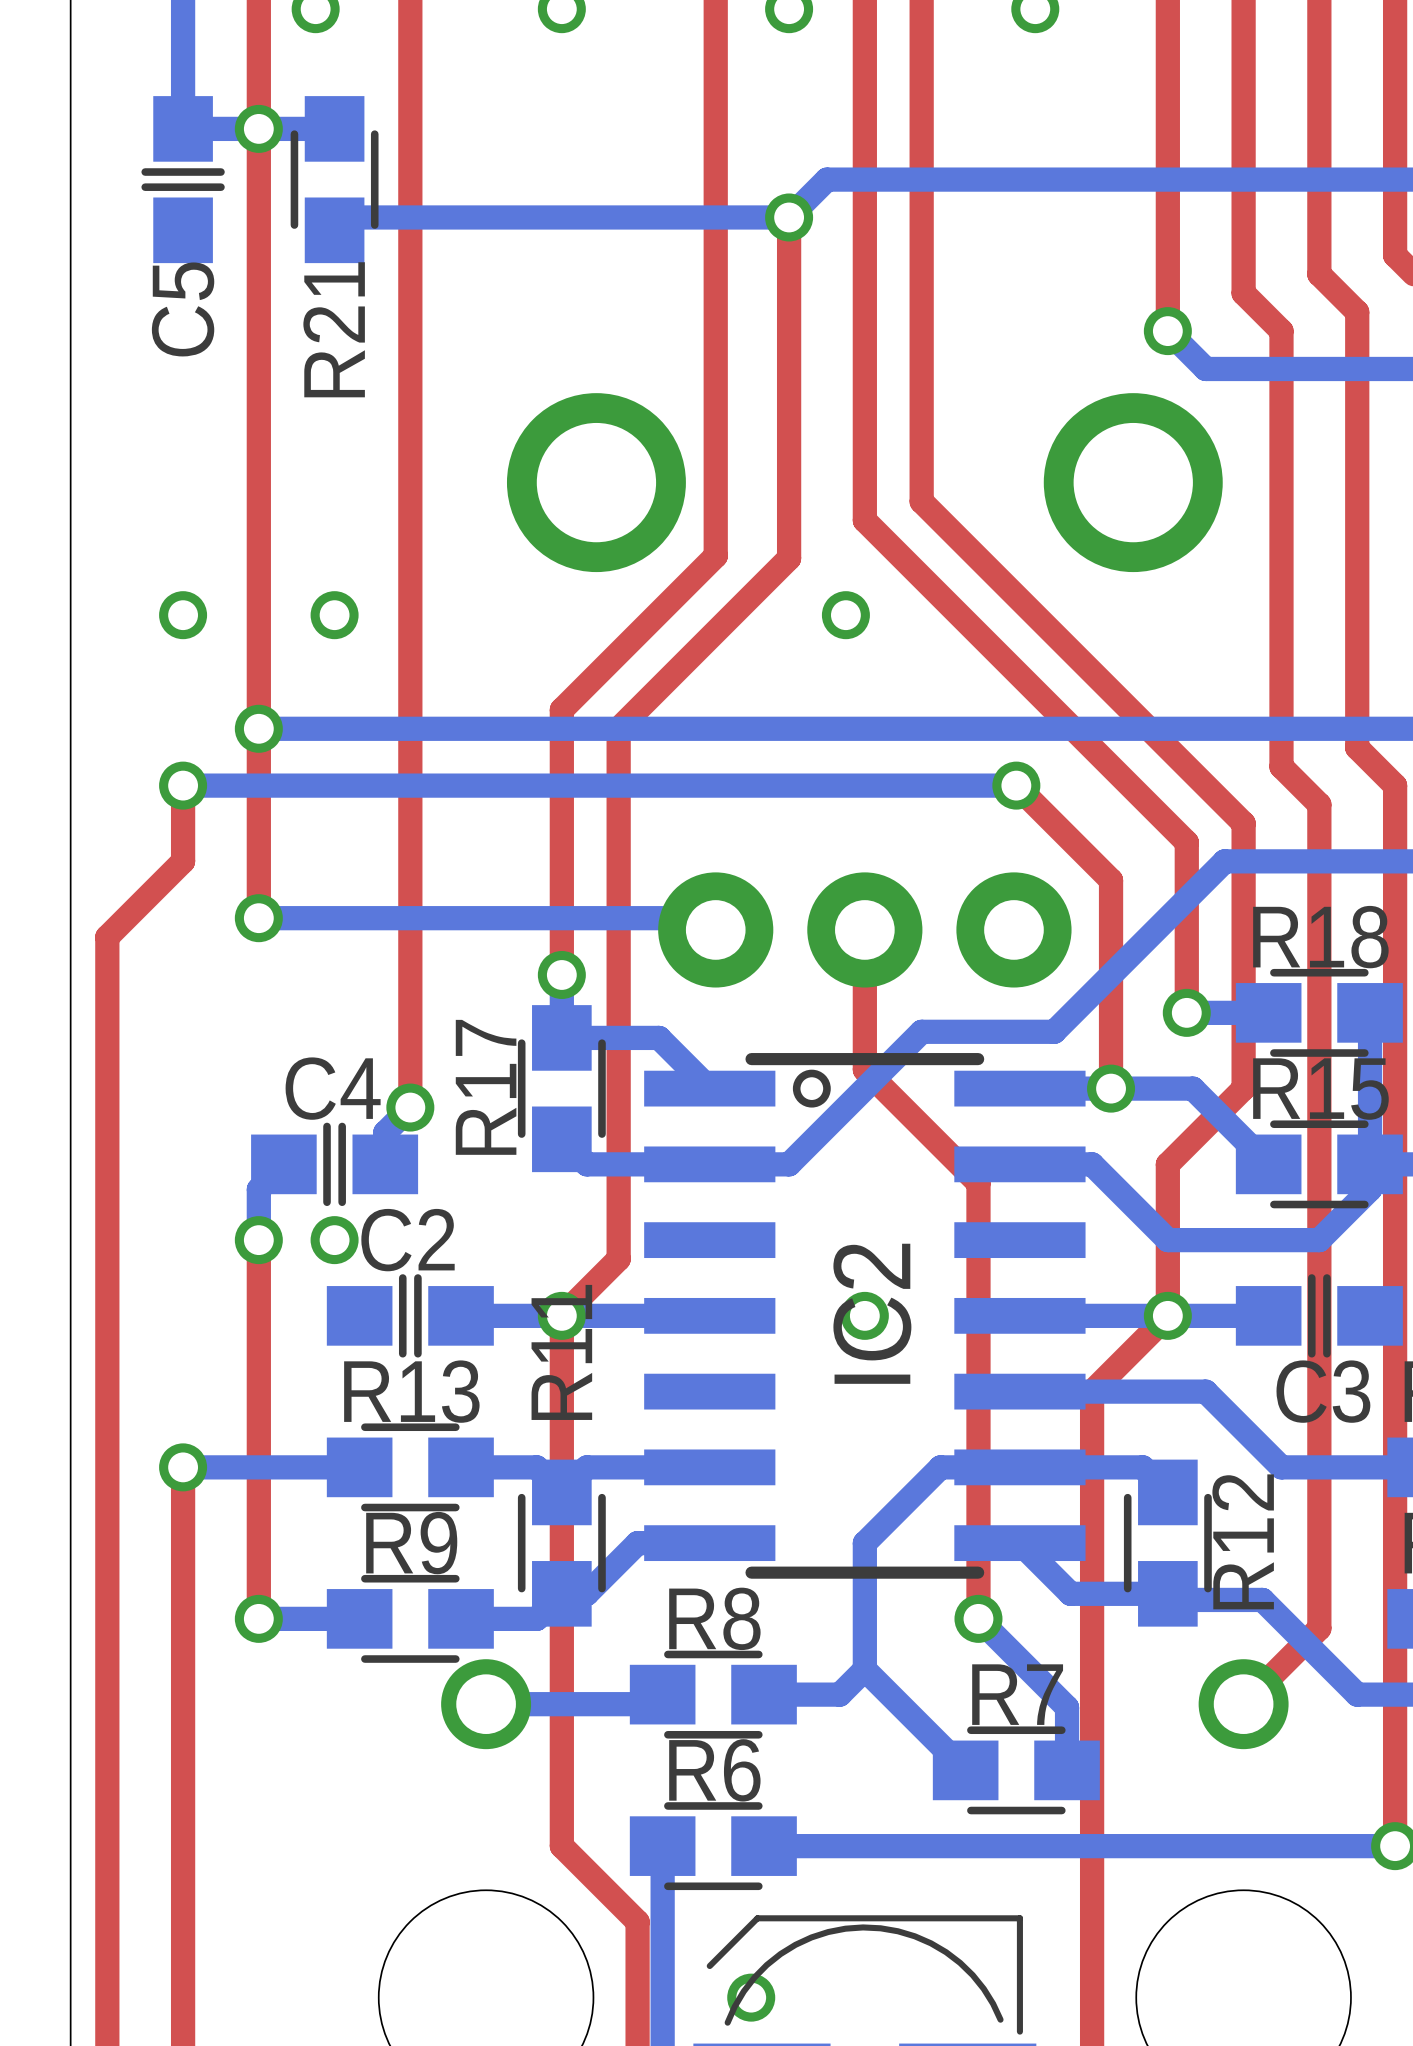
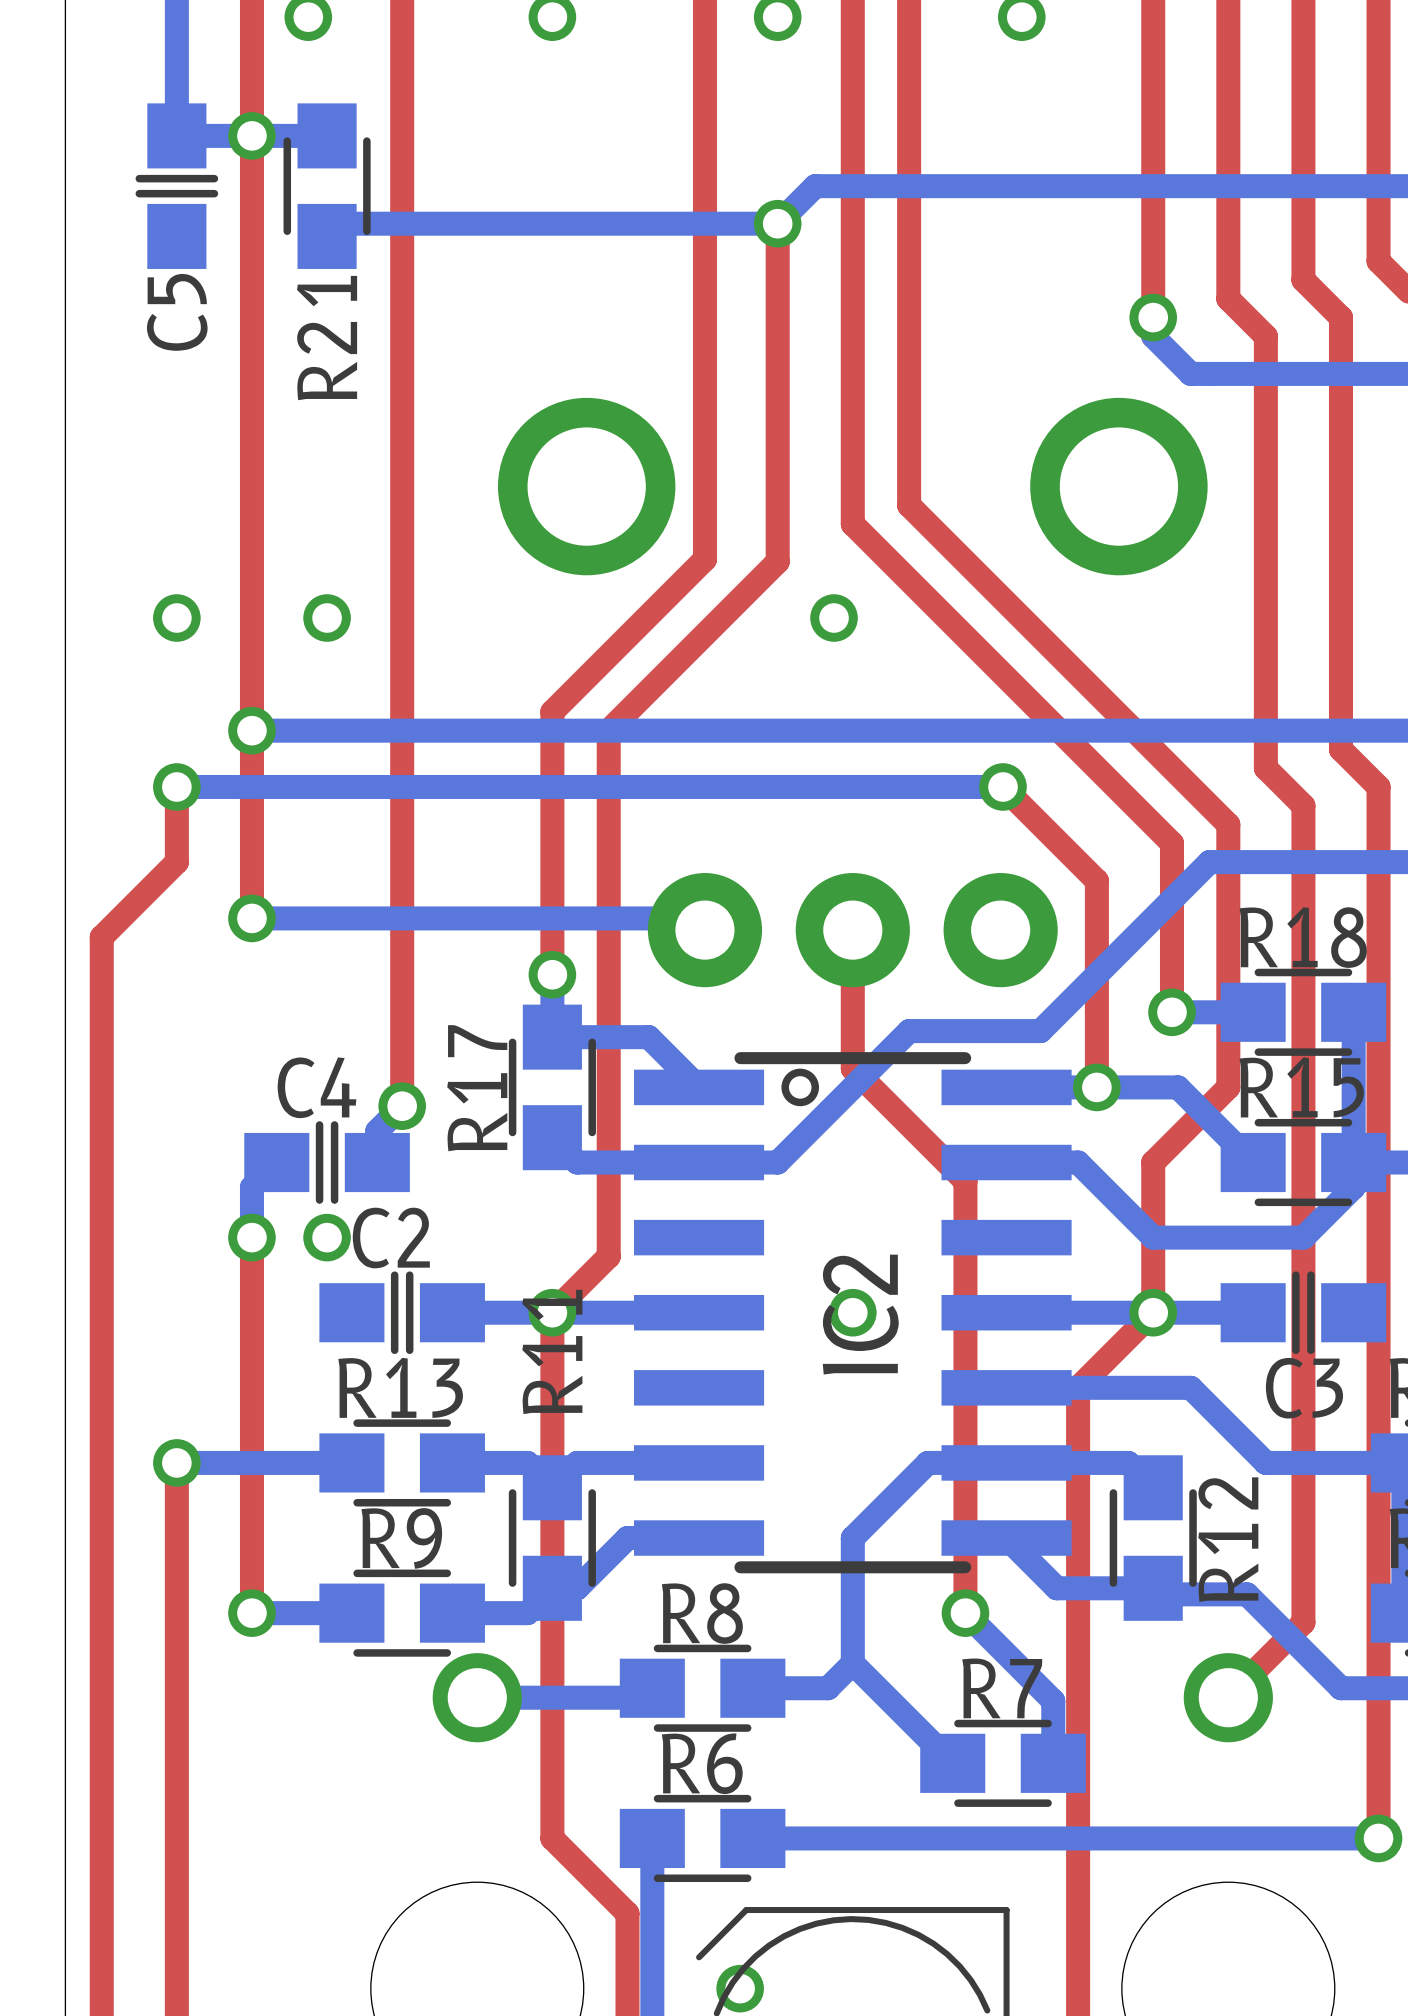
via position: (1167, 331) -> (1153, 317)

